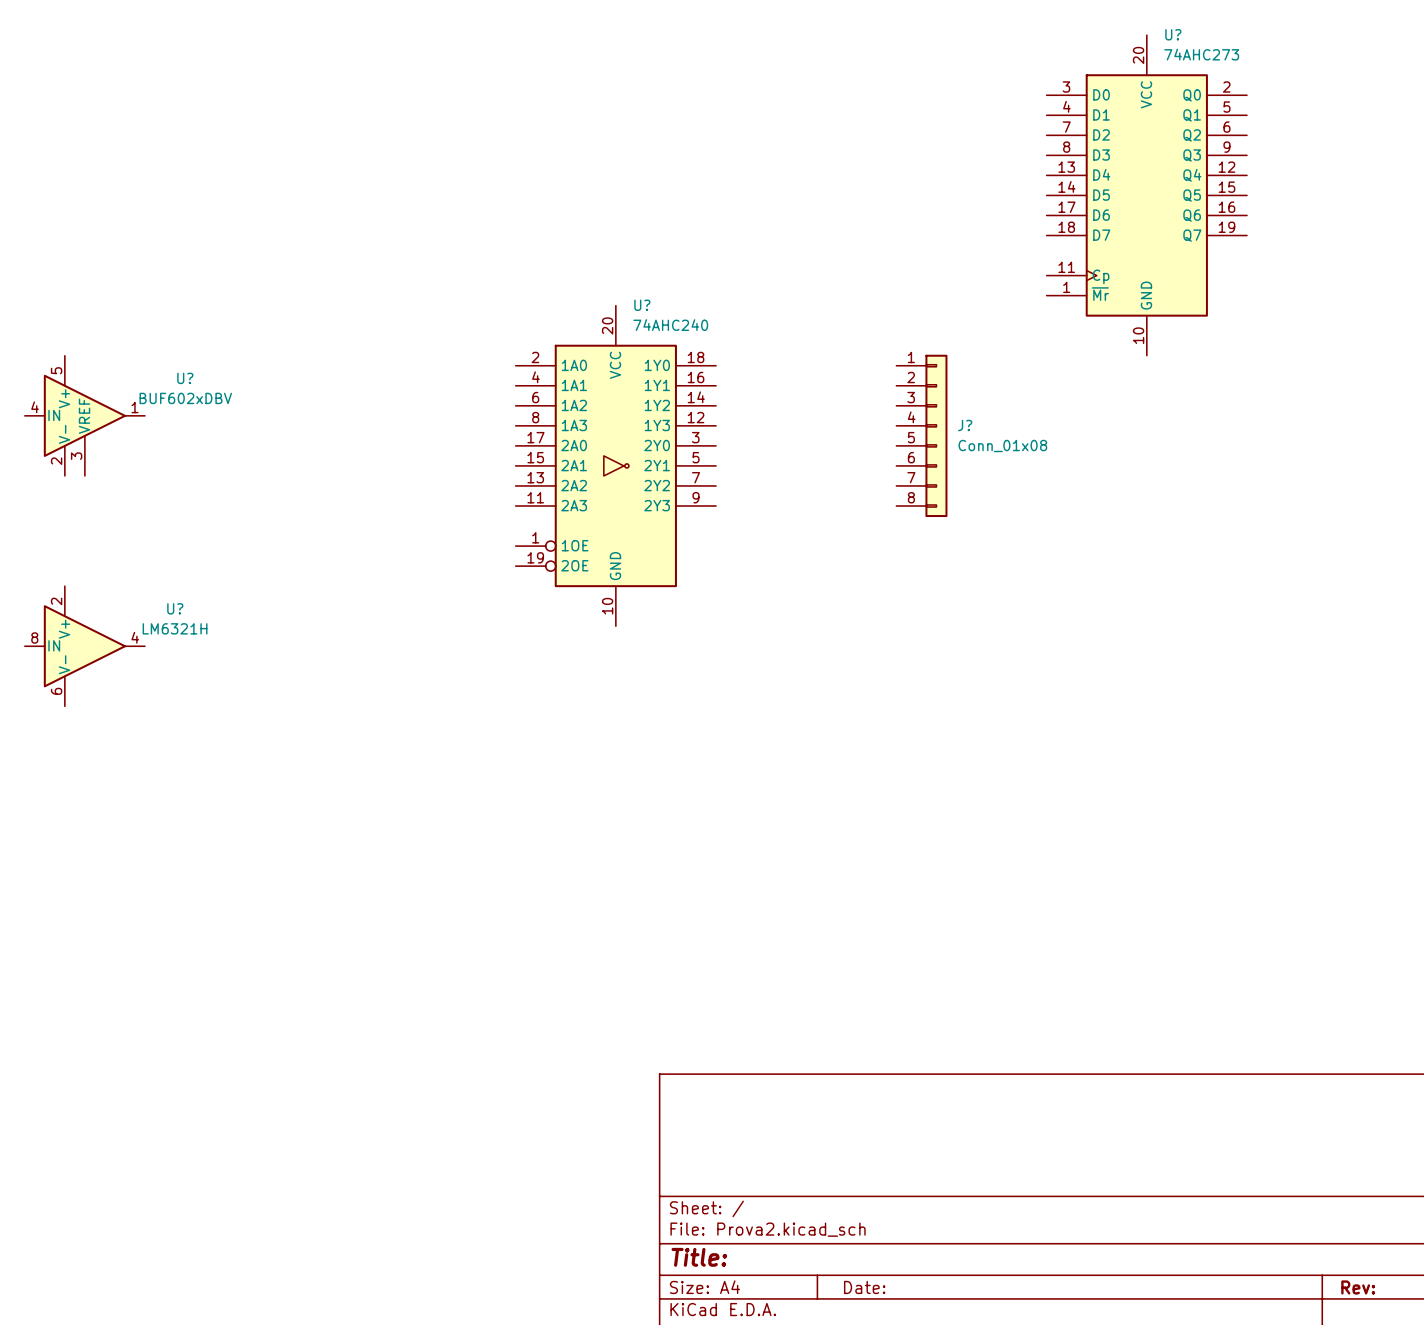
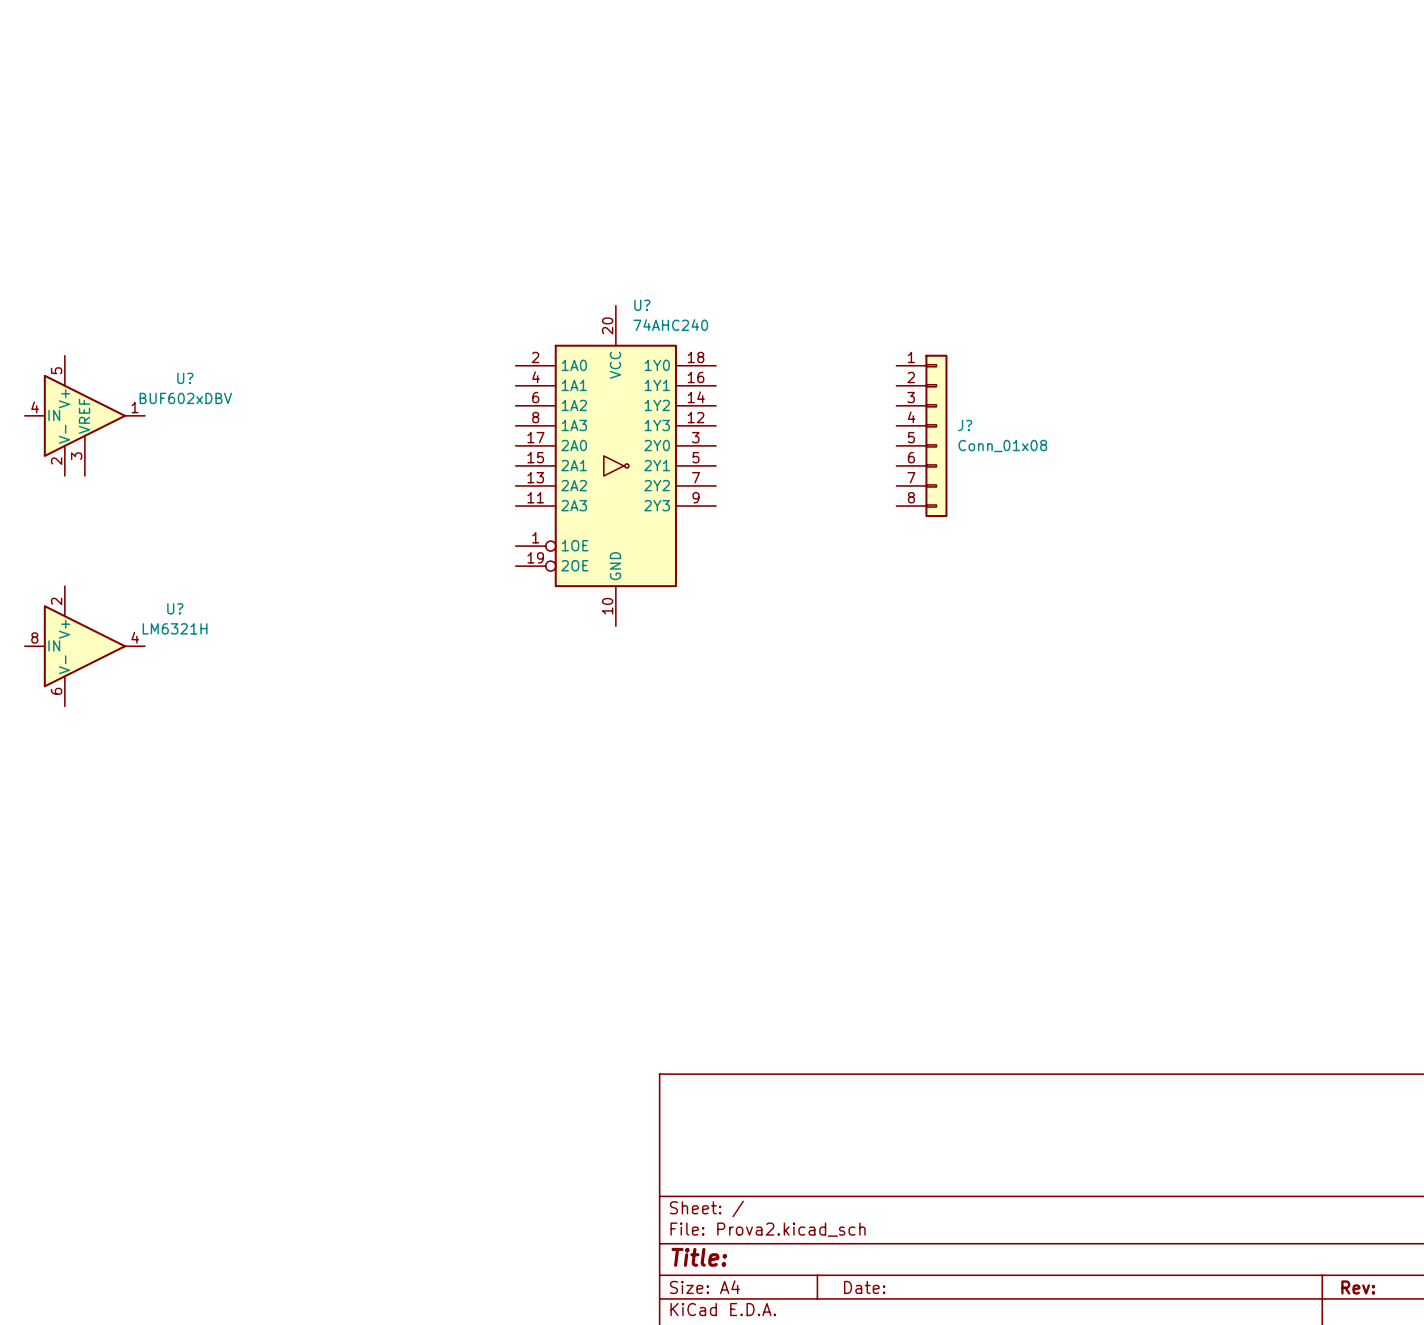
U?: 74AHC273 (1146, 195) -> none

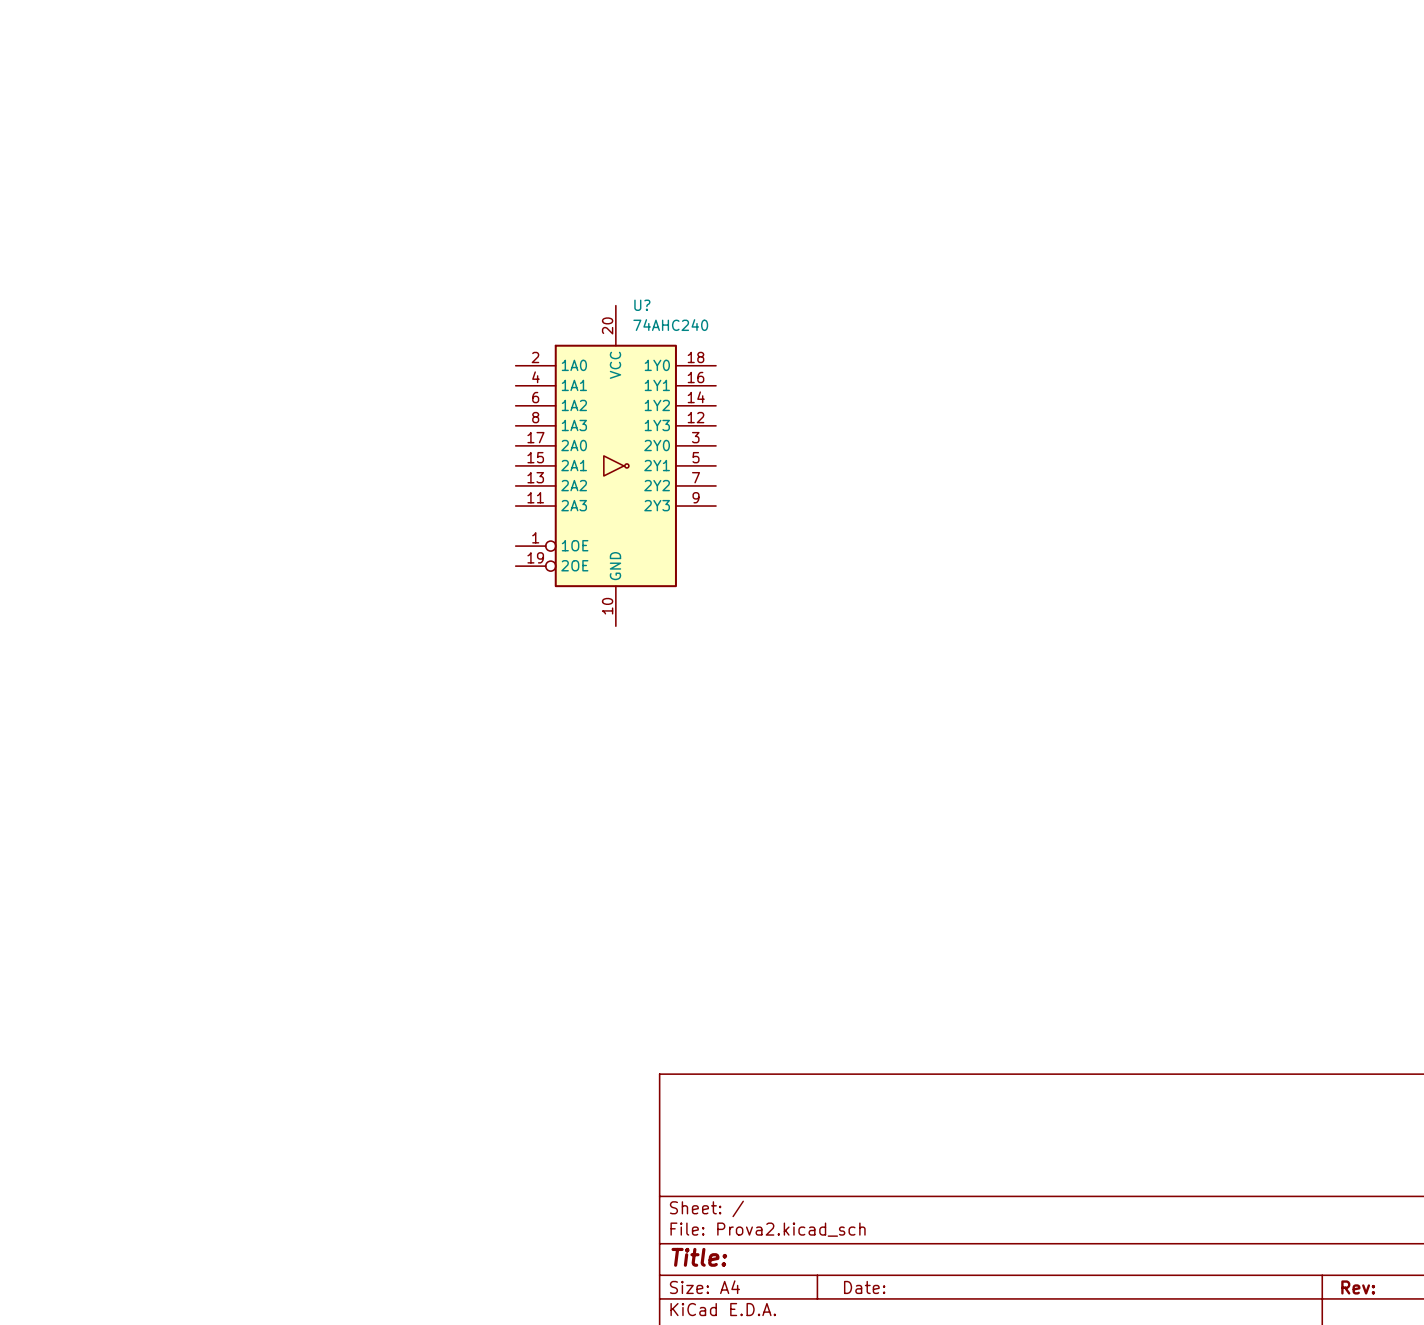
U?: BUF602xDBV (84, 415) -> none
J?: Conn_01x08 (921, 435) -> none
U?: LM6321H (84, 646) -> none

